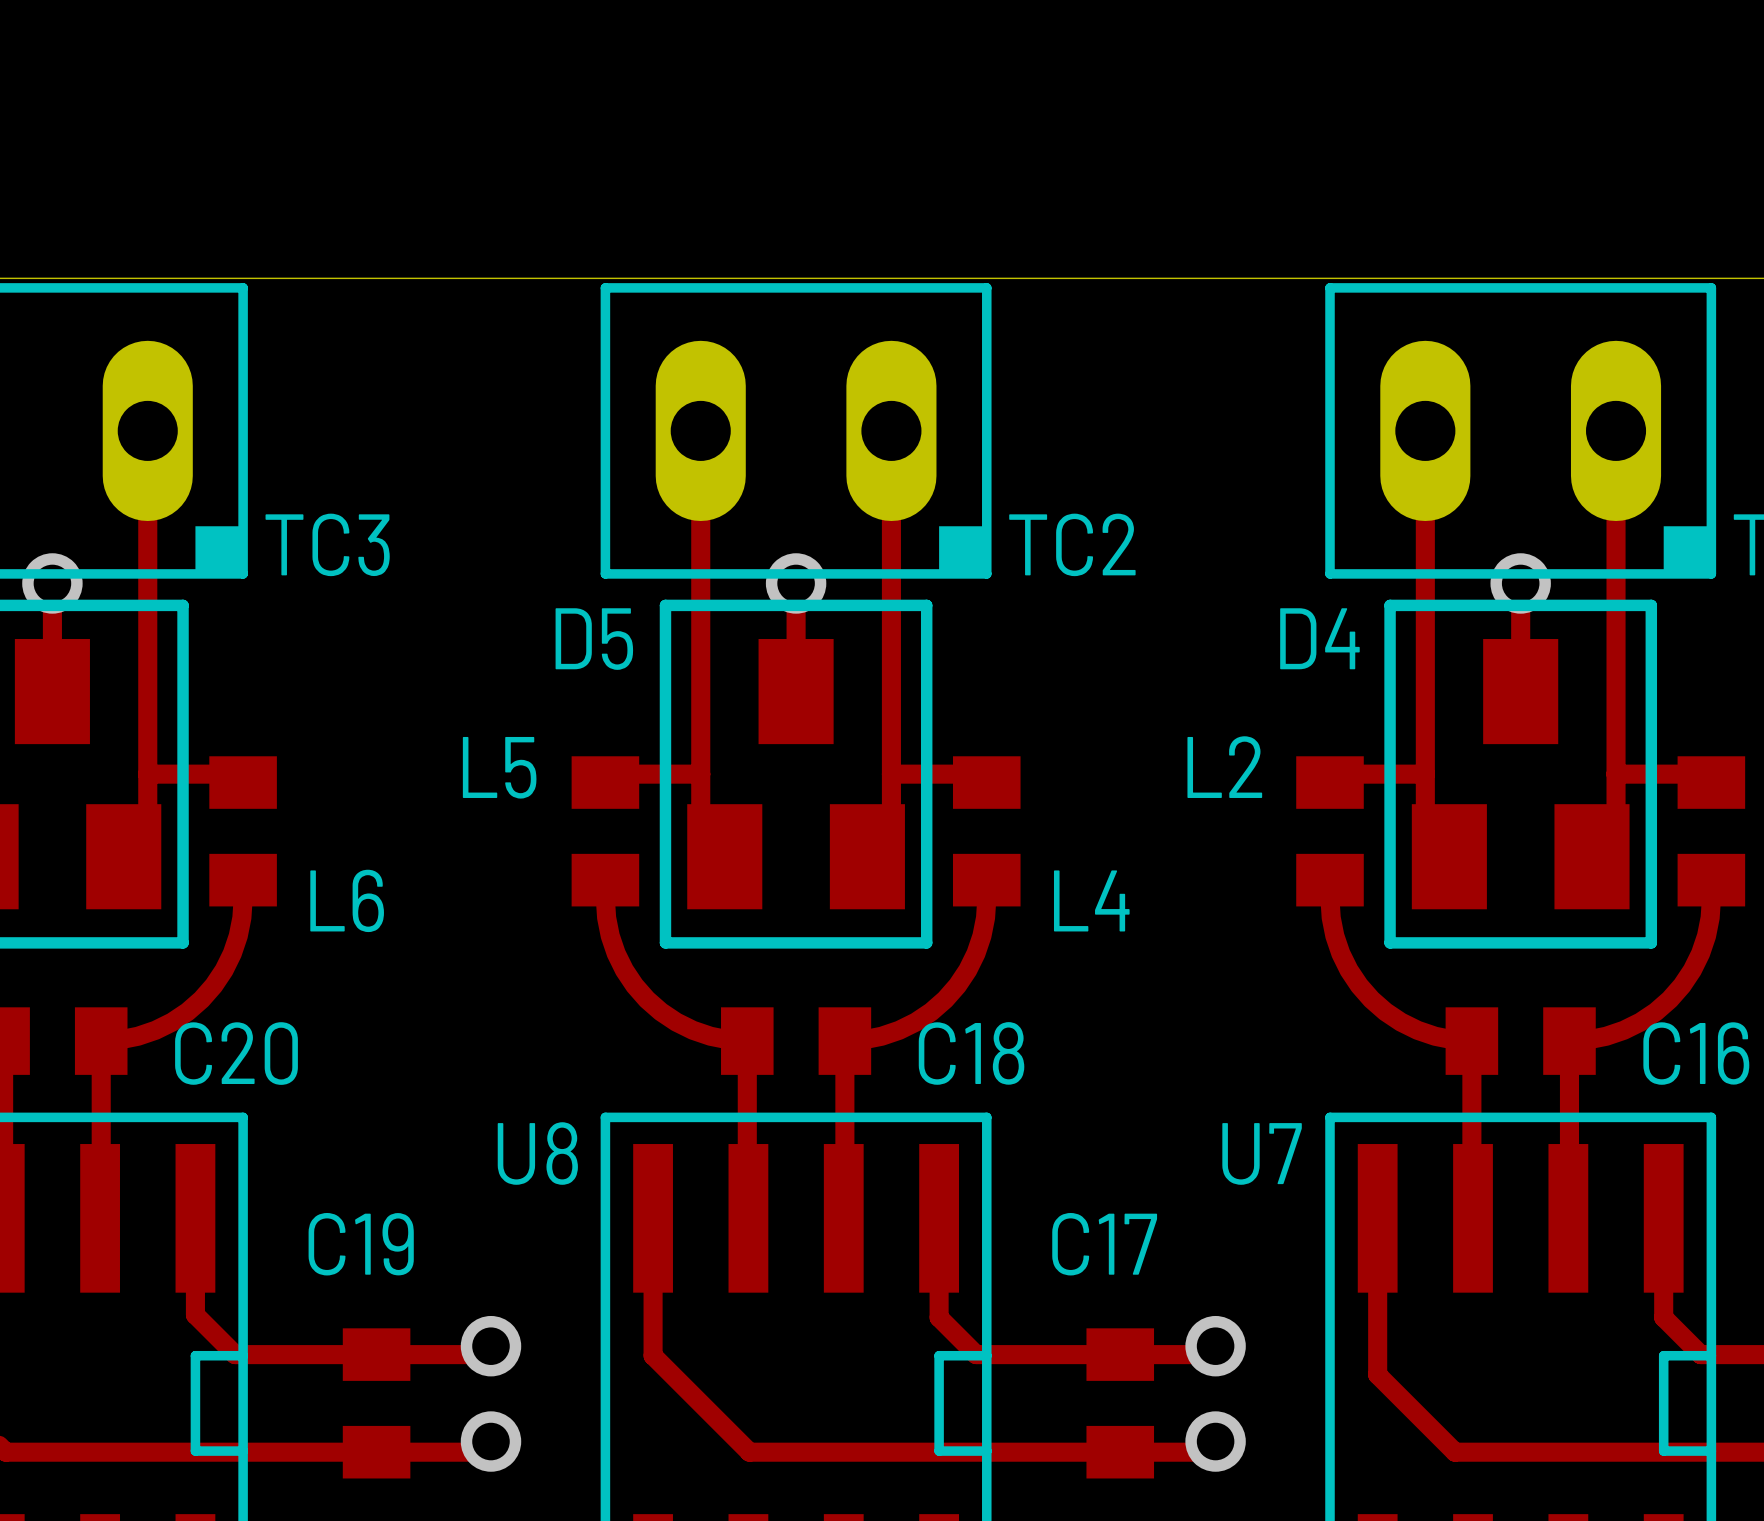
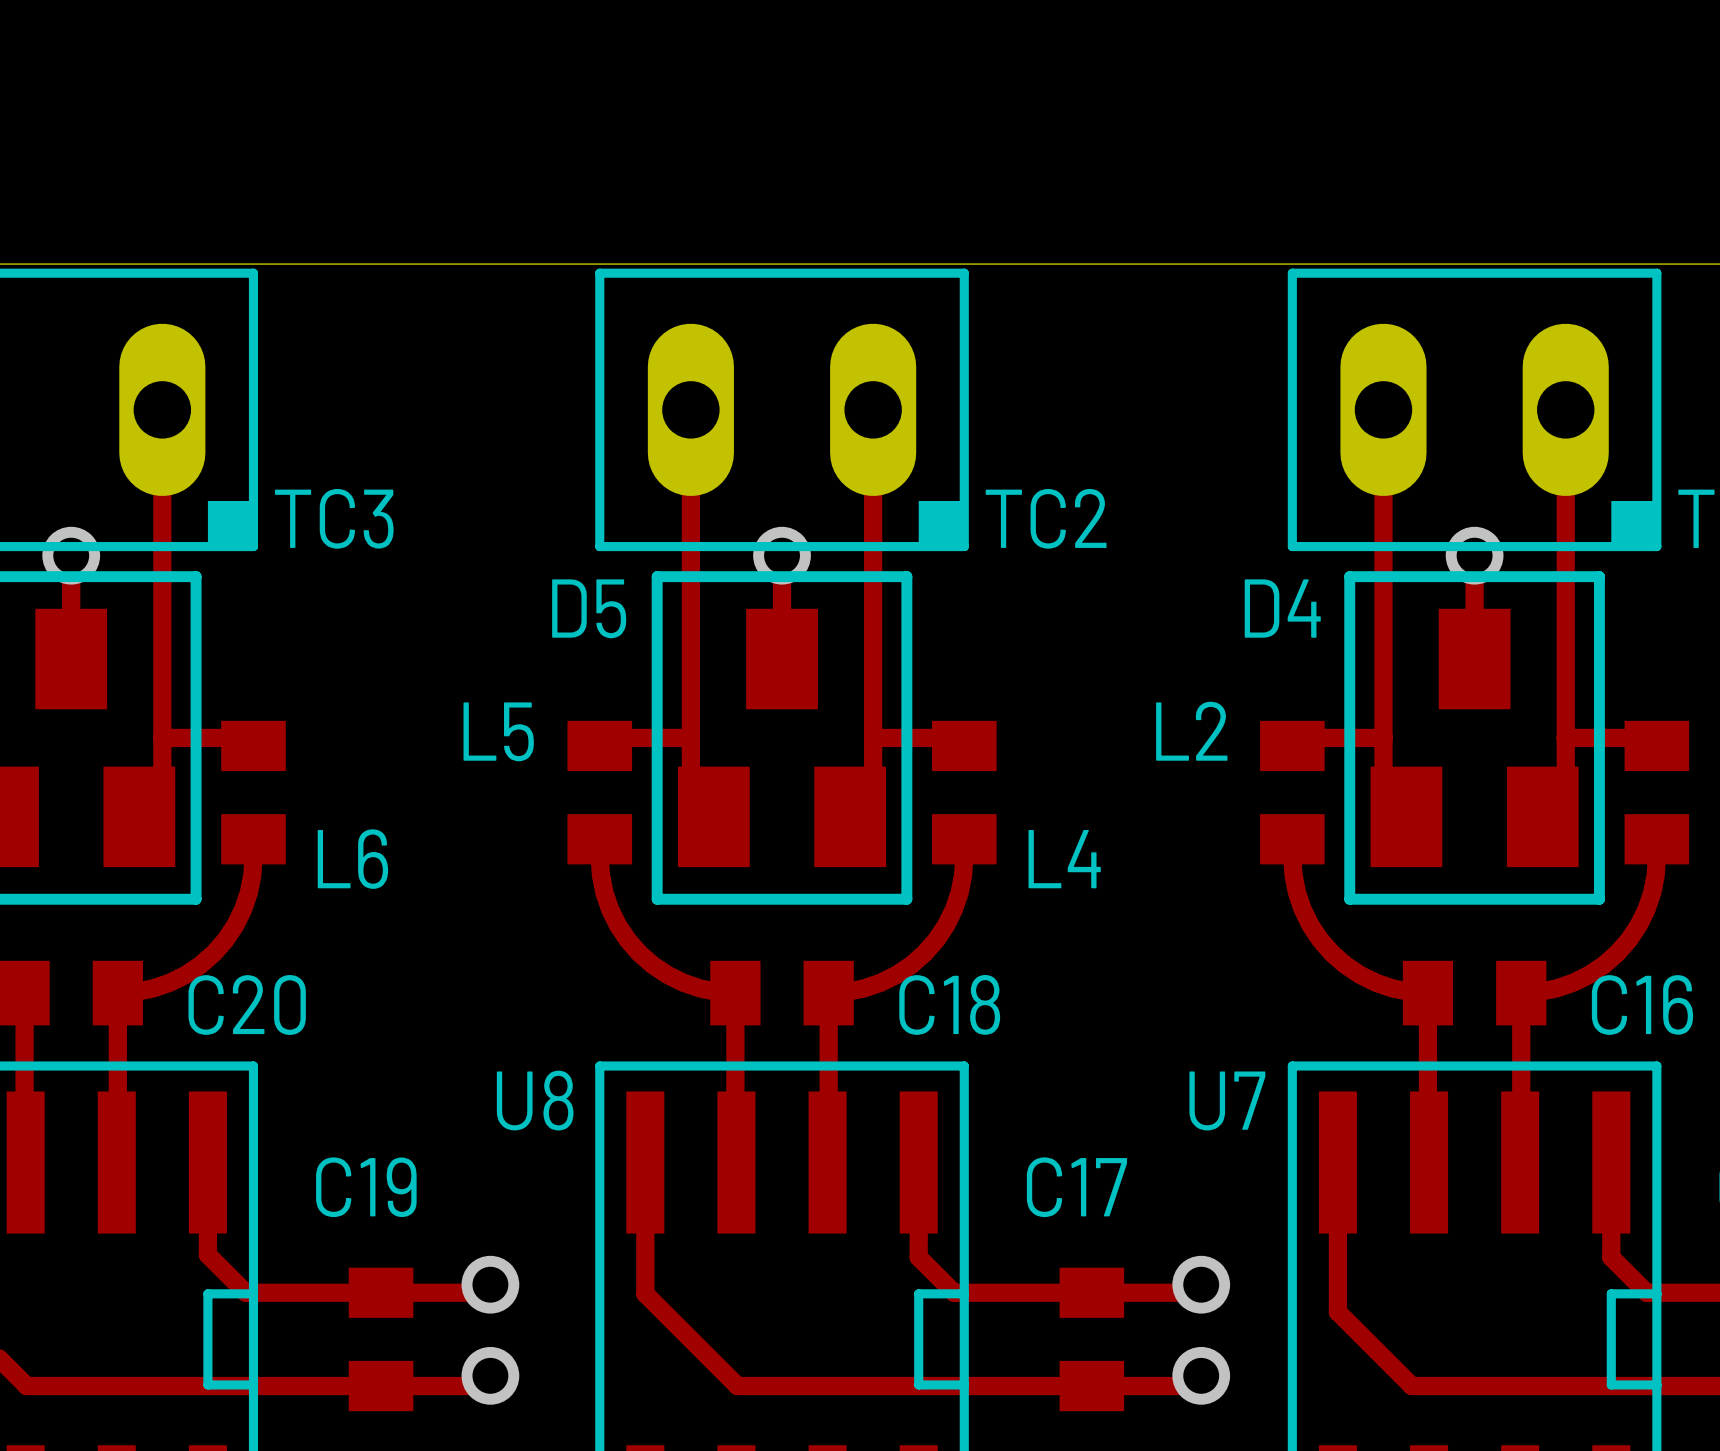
via position: (1215, 1346) -> (1201, 1284)
via position: (1215, 1441) -> (1201, 1375)

